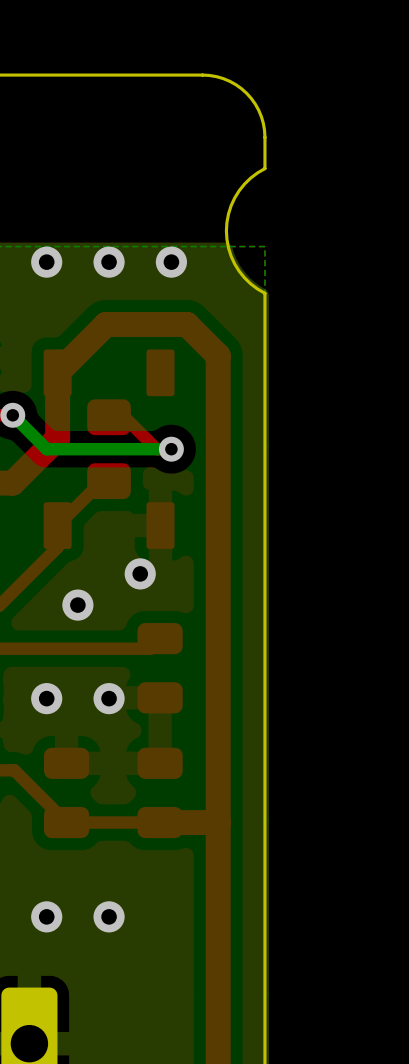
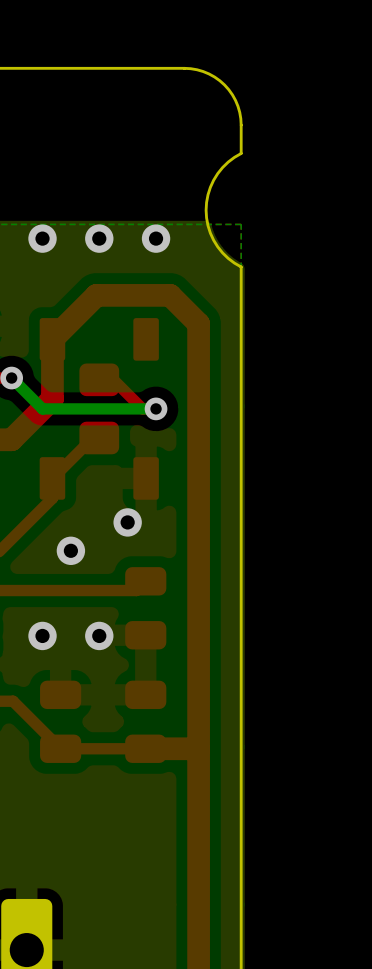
via: (46, 916) -> none
via: (109, 916) -> none

